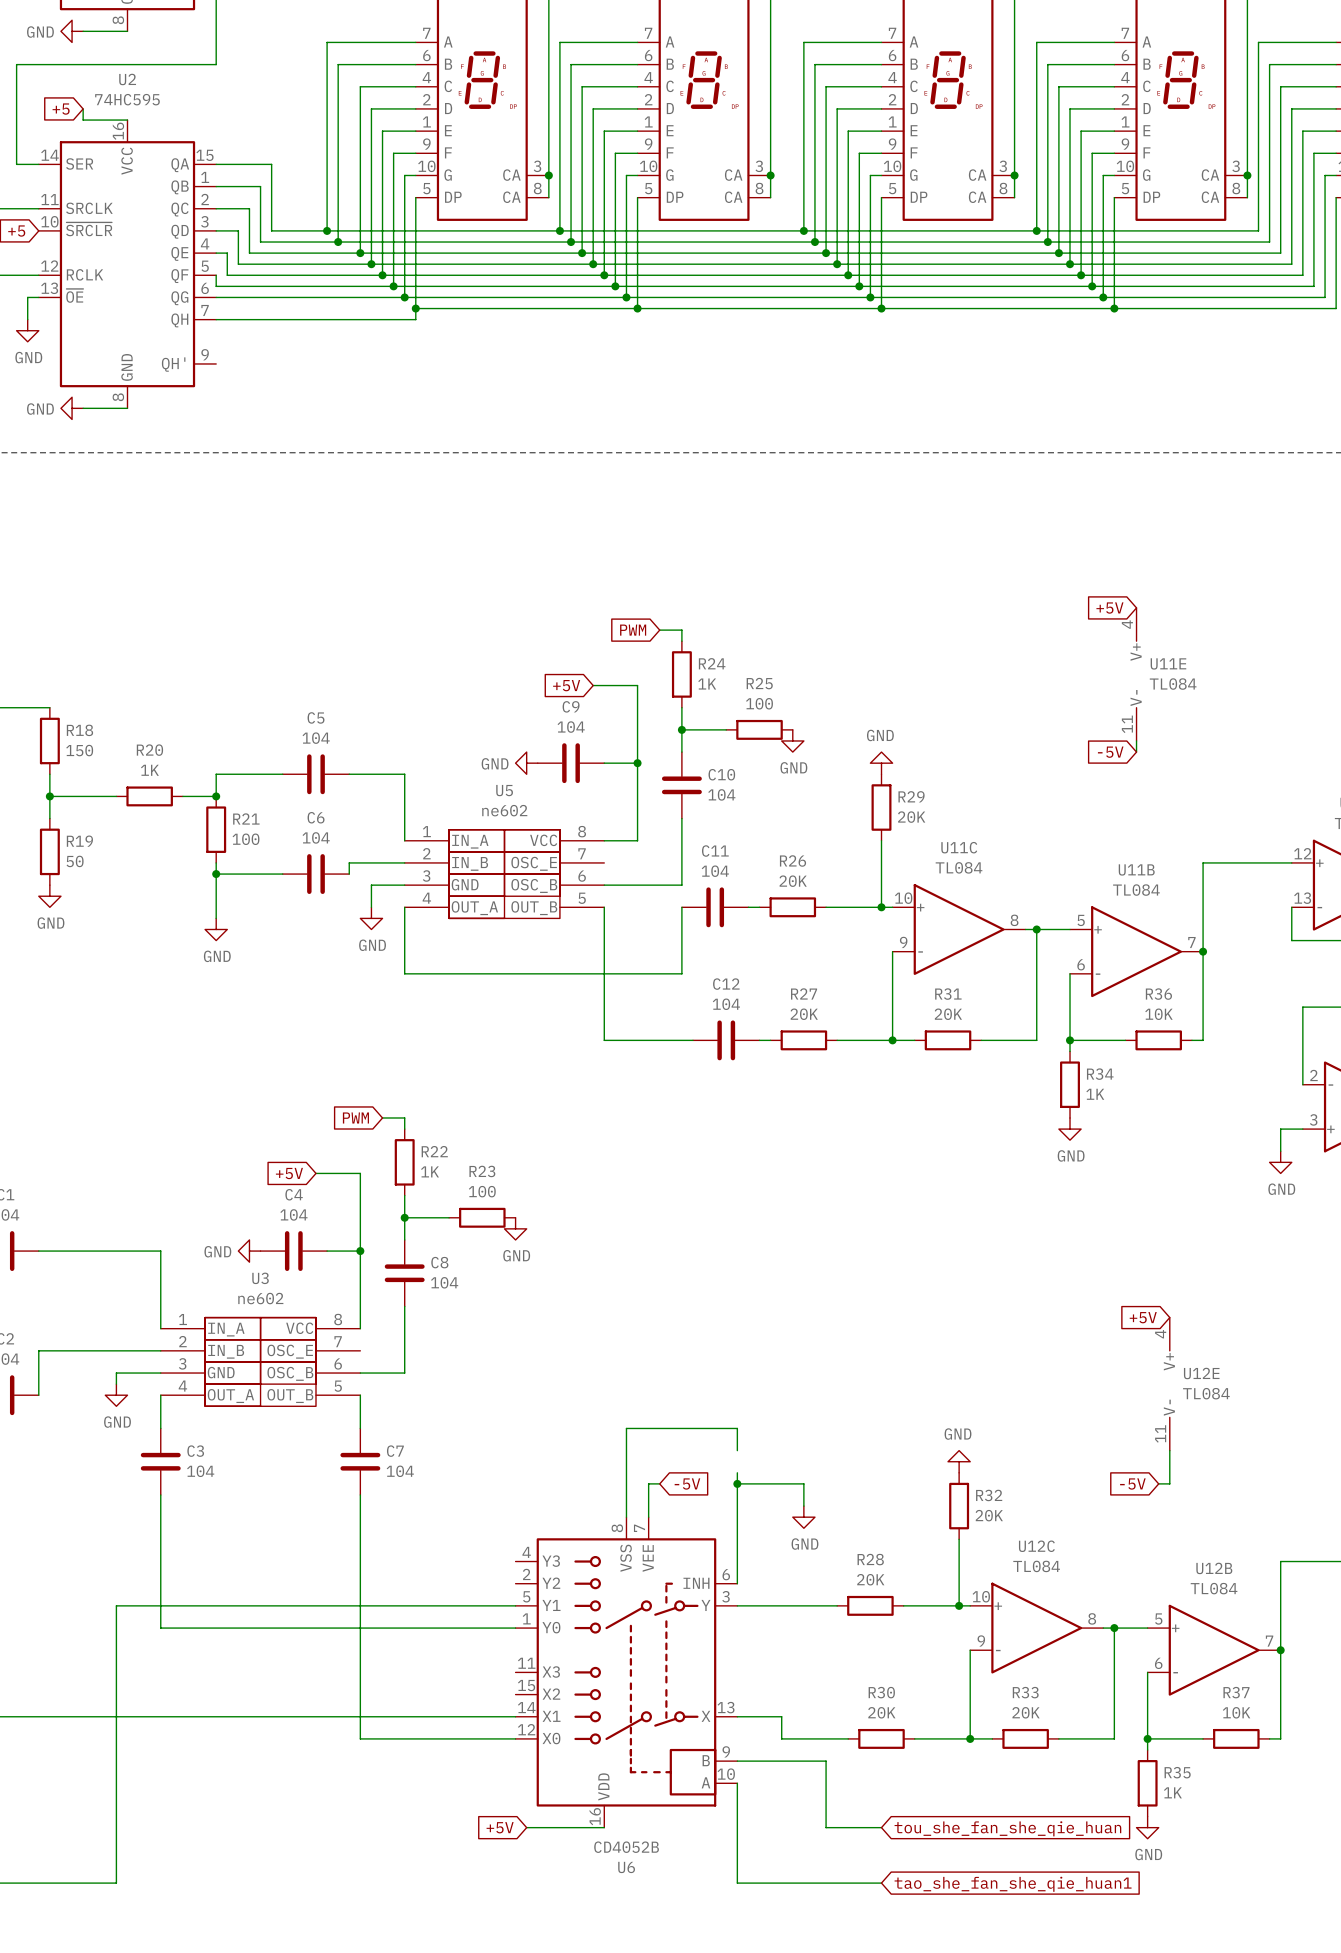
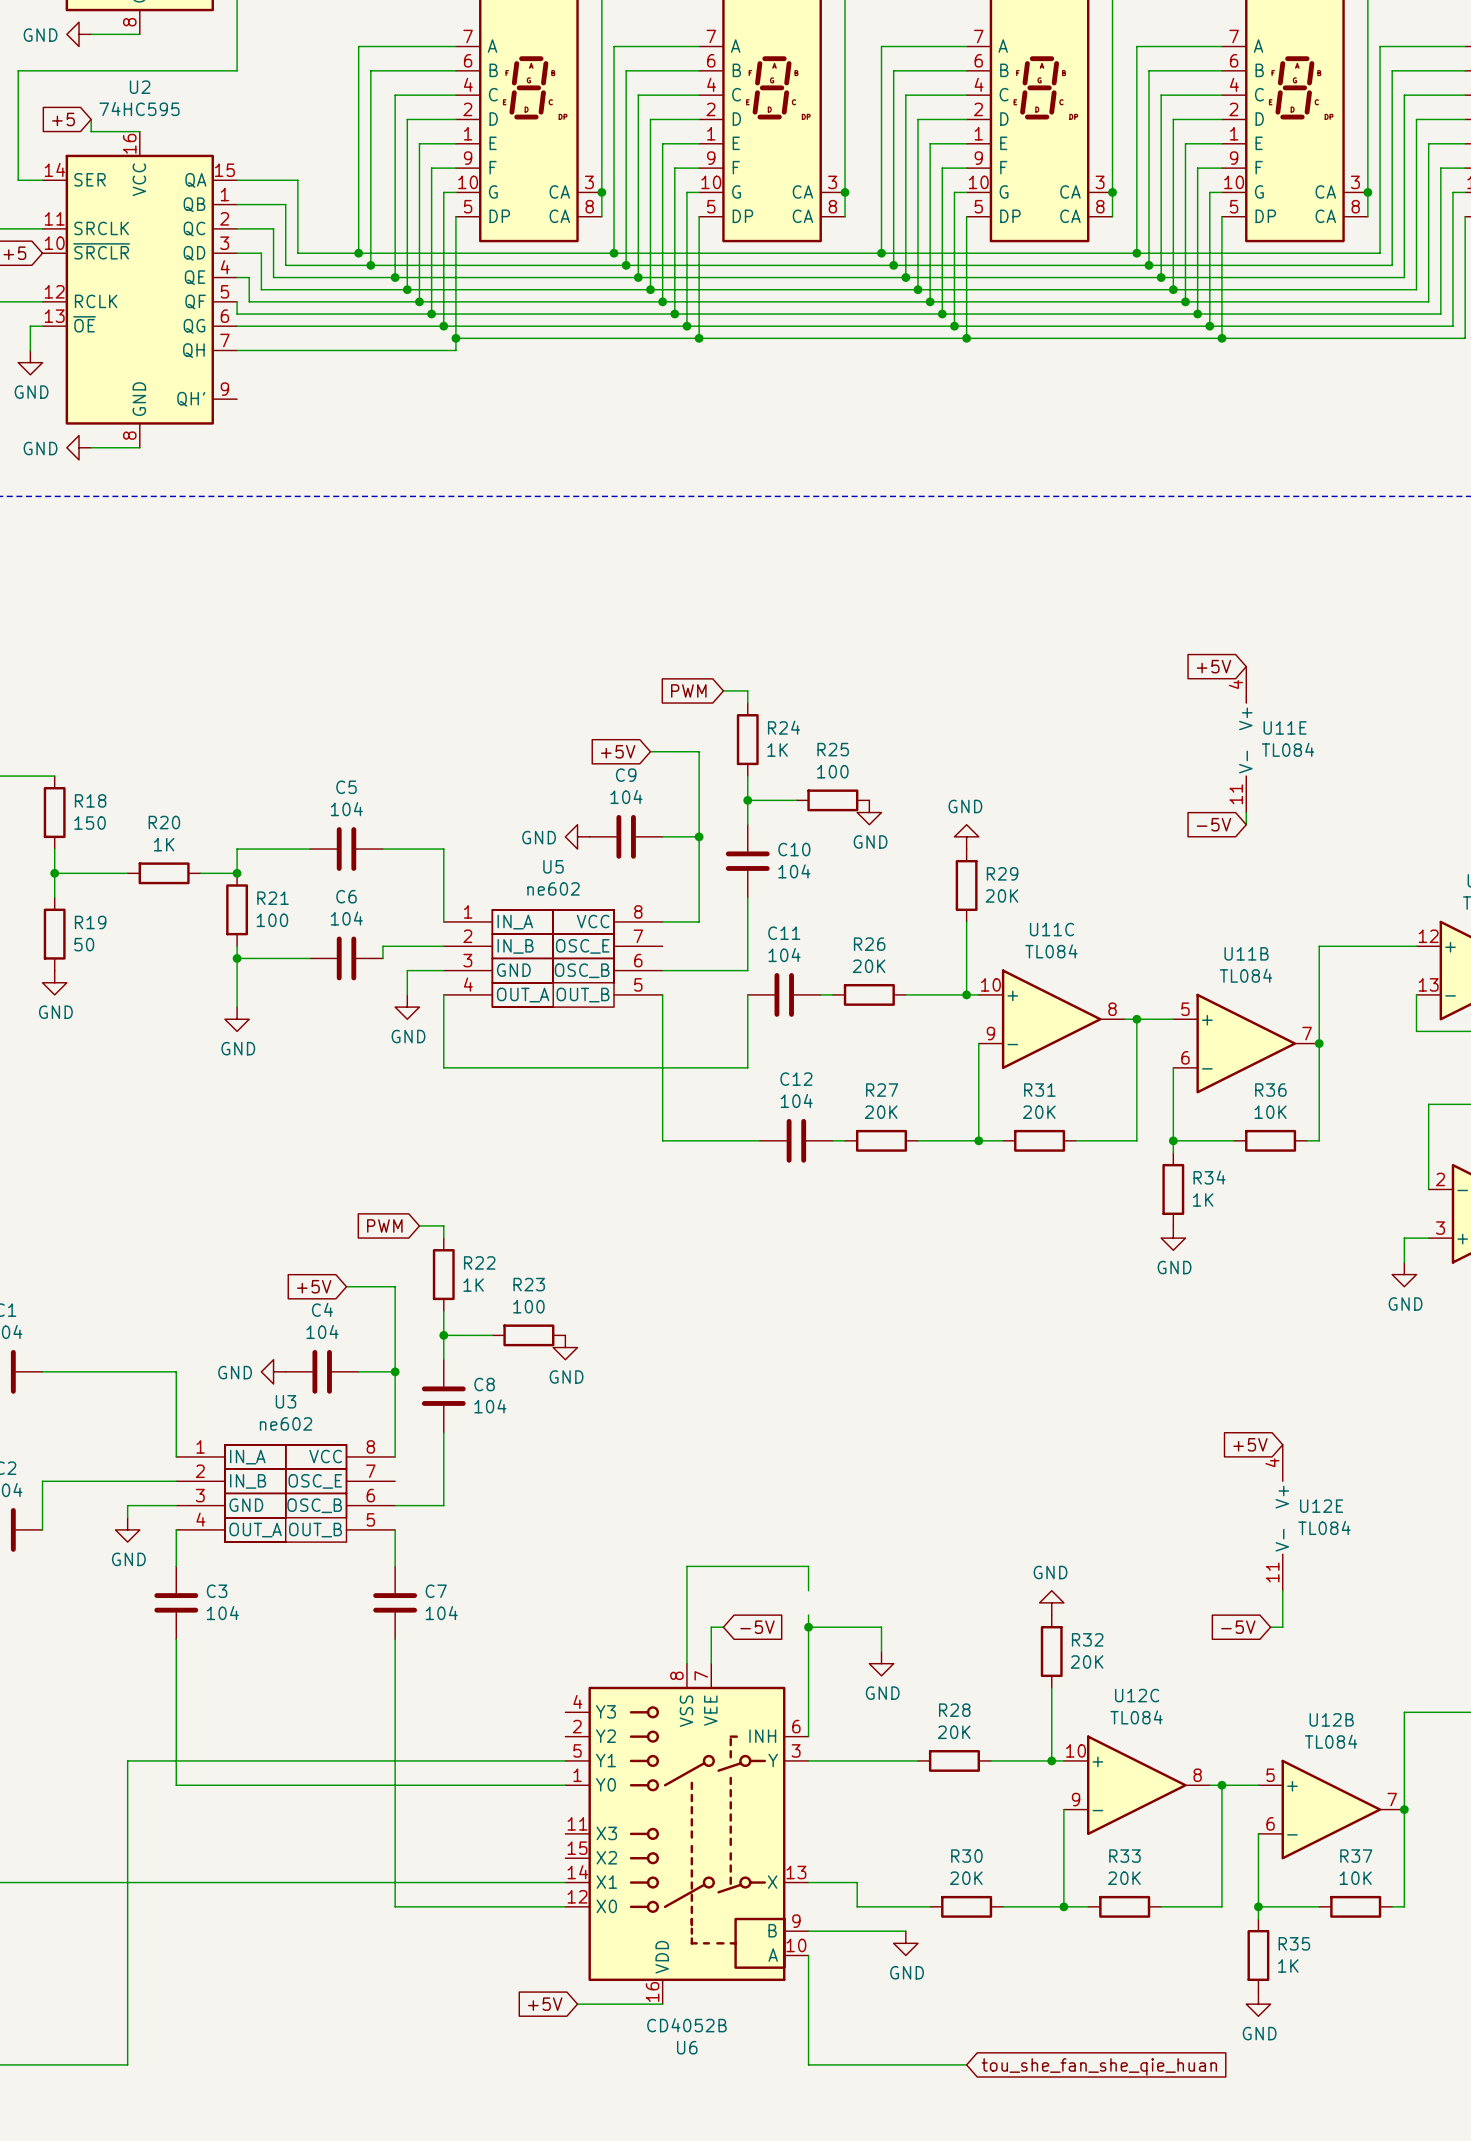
wire: (826, 1761) (826, 1827) (881, 1827) -> none
power symbol: none -> GND (905, 1943)
global label: tou_she_fan_she_qie_huan (1007, 1828) -> none
global label: tao_she_fan_she_qie_huan1 (1013, 1884) -> tou_she_fan_she_qie_huan (1099, 2066)

